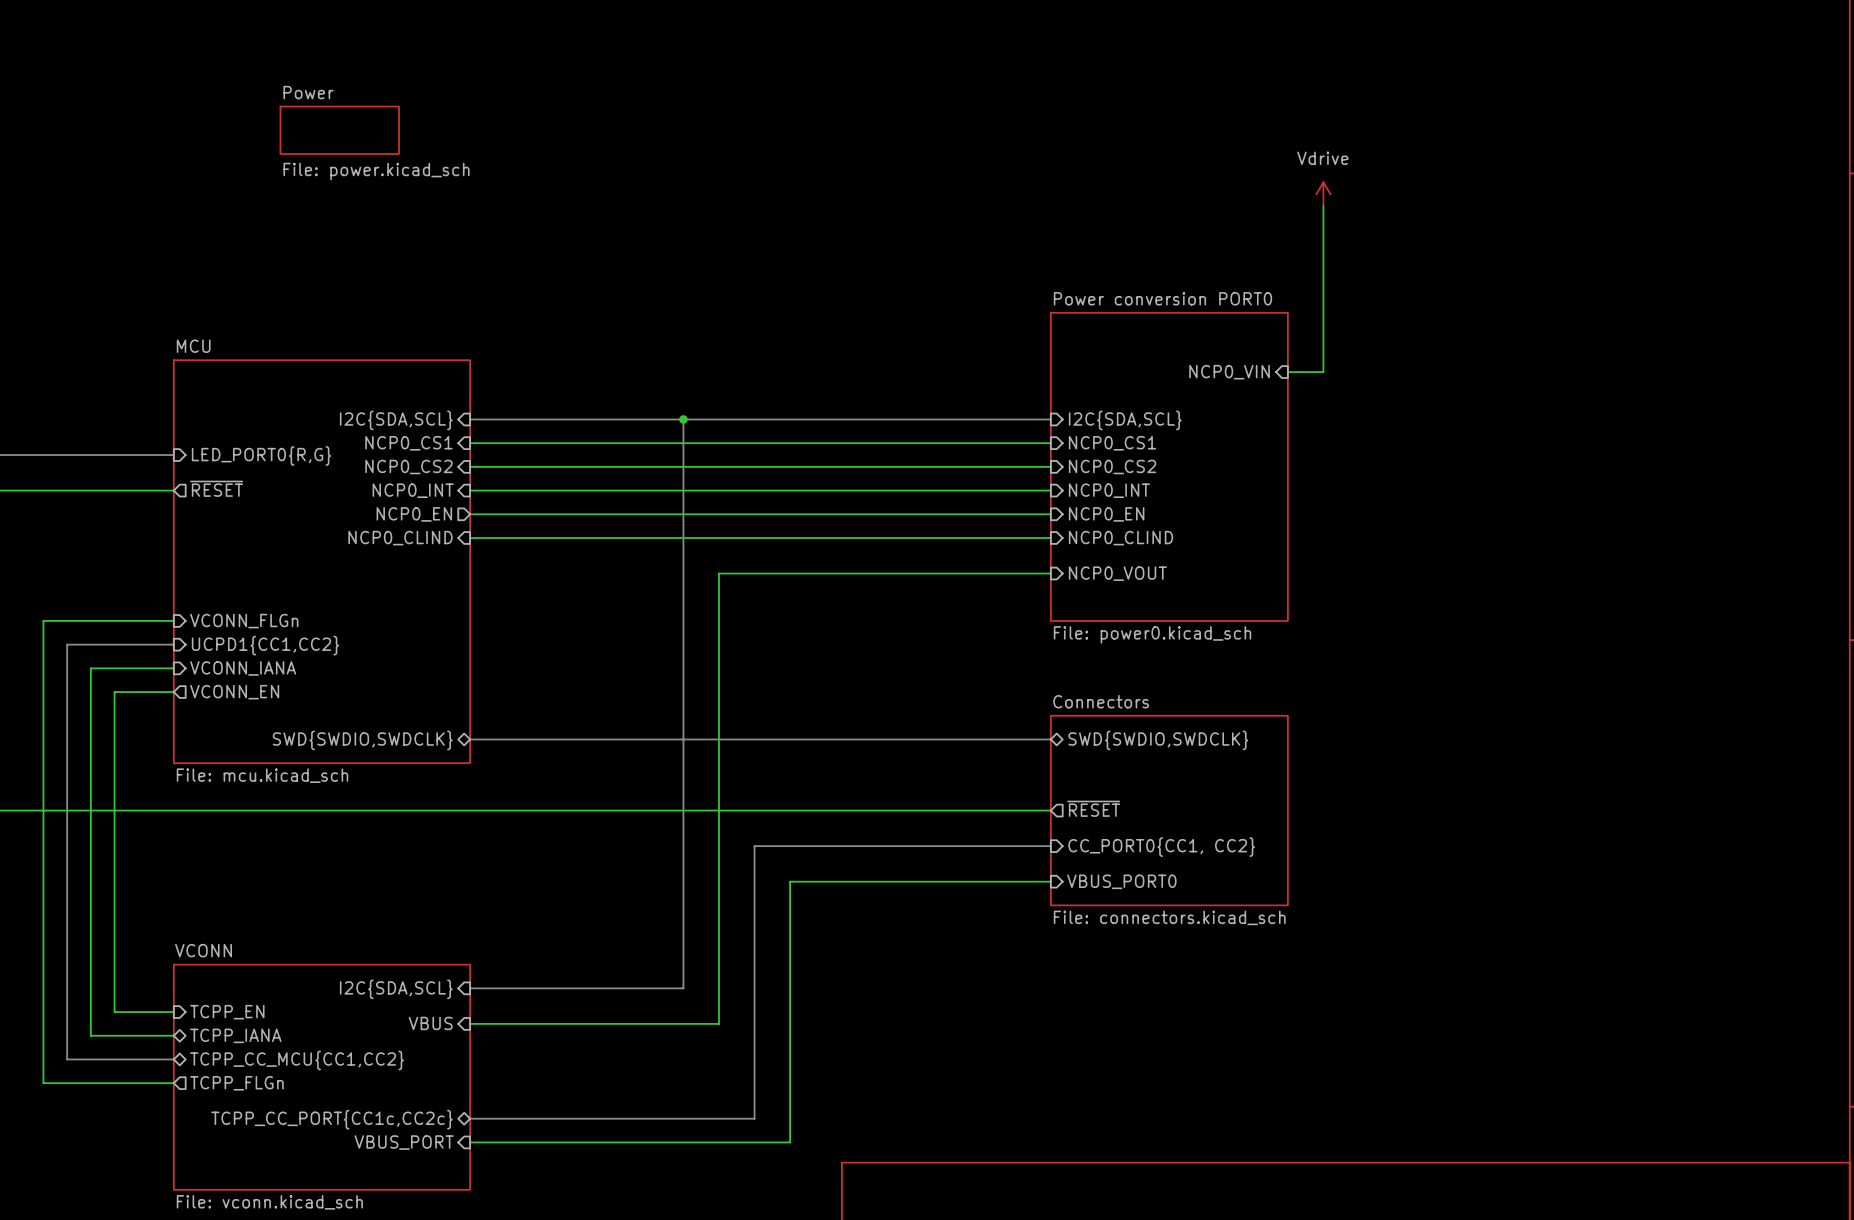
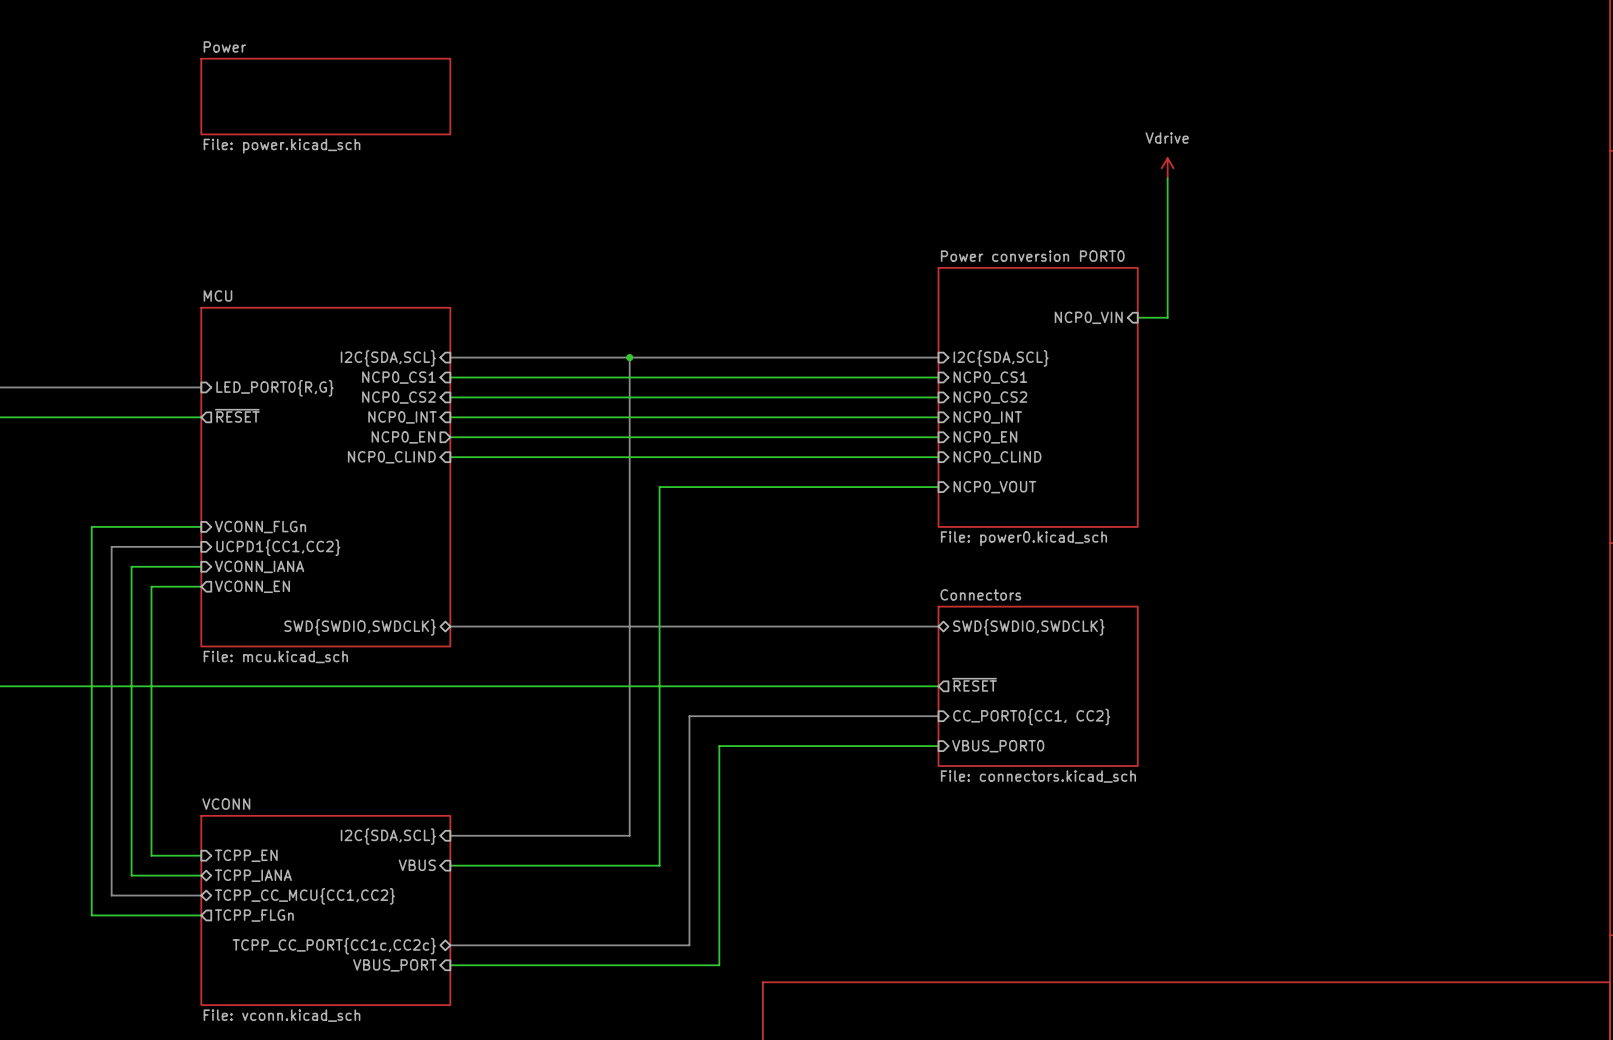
sheet Power: none -> File: power.kicad_sch (325, 96)
sheet Power: File: power.kicad_sch (339, 130) -> none

